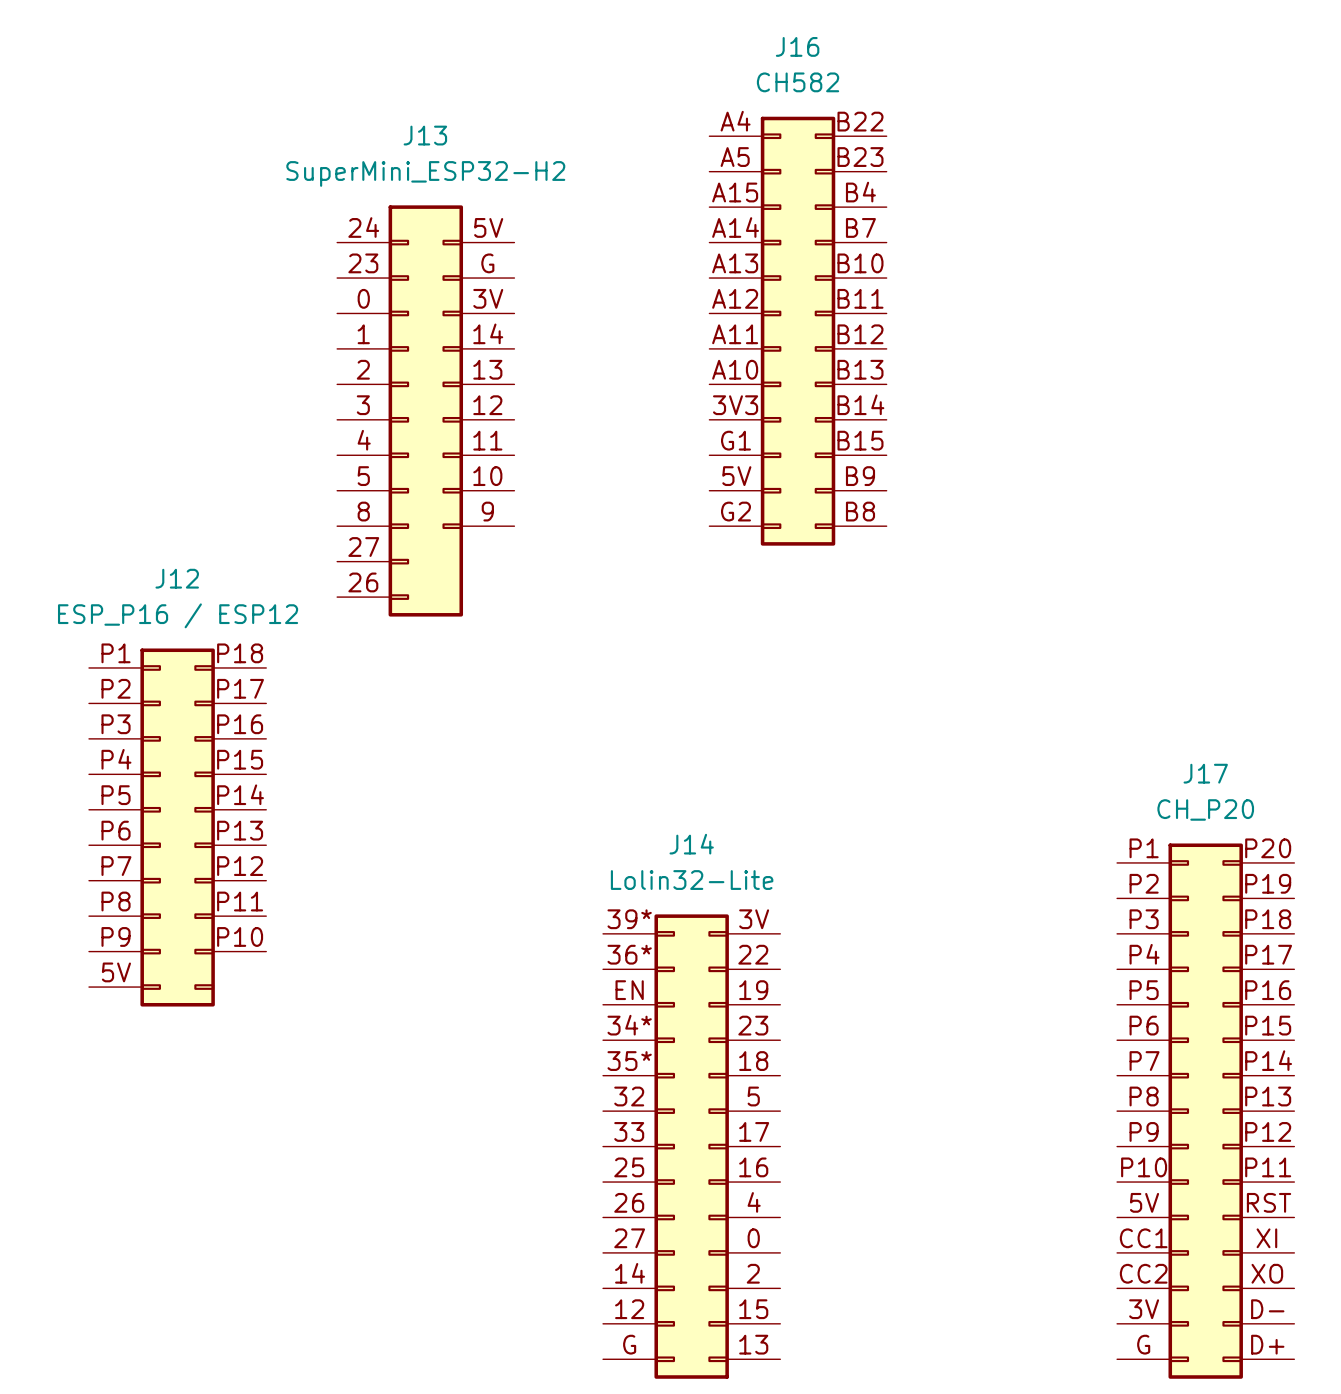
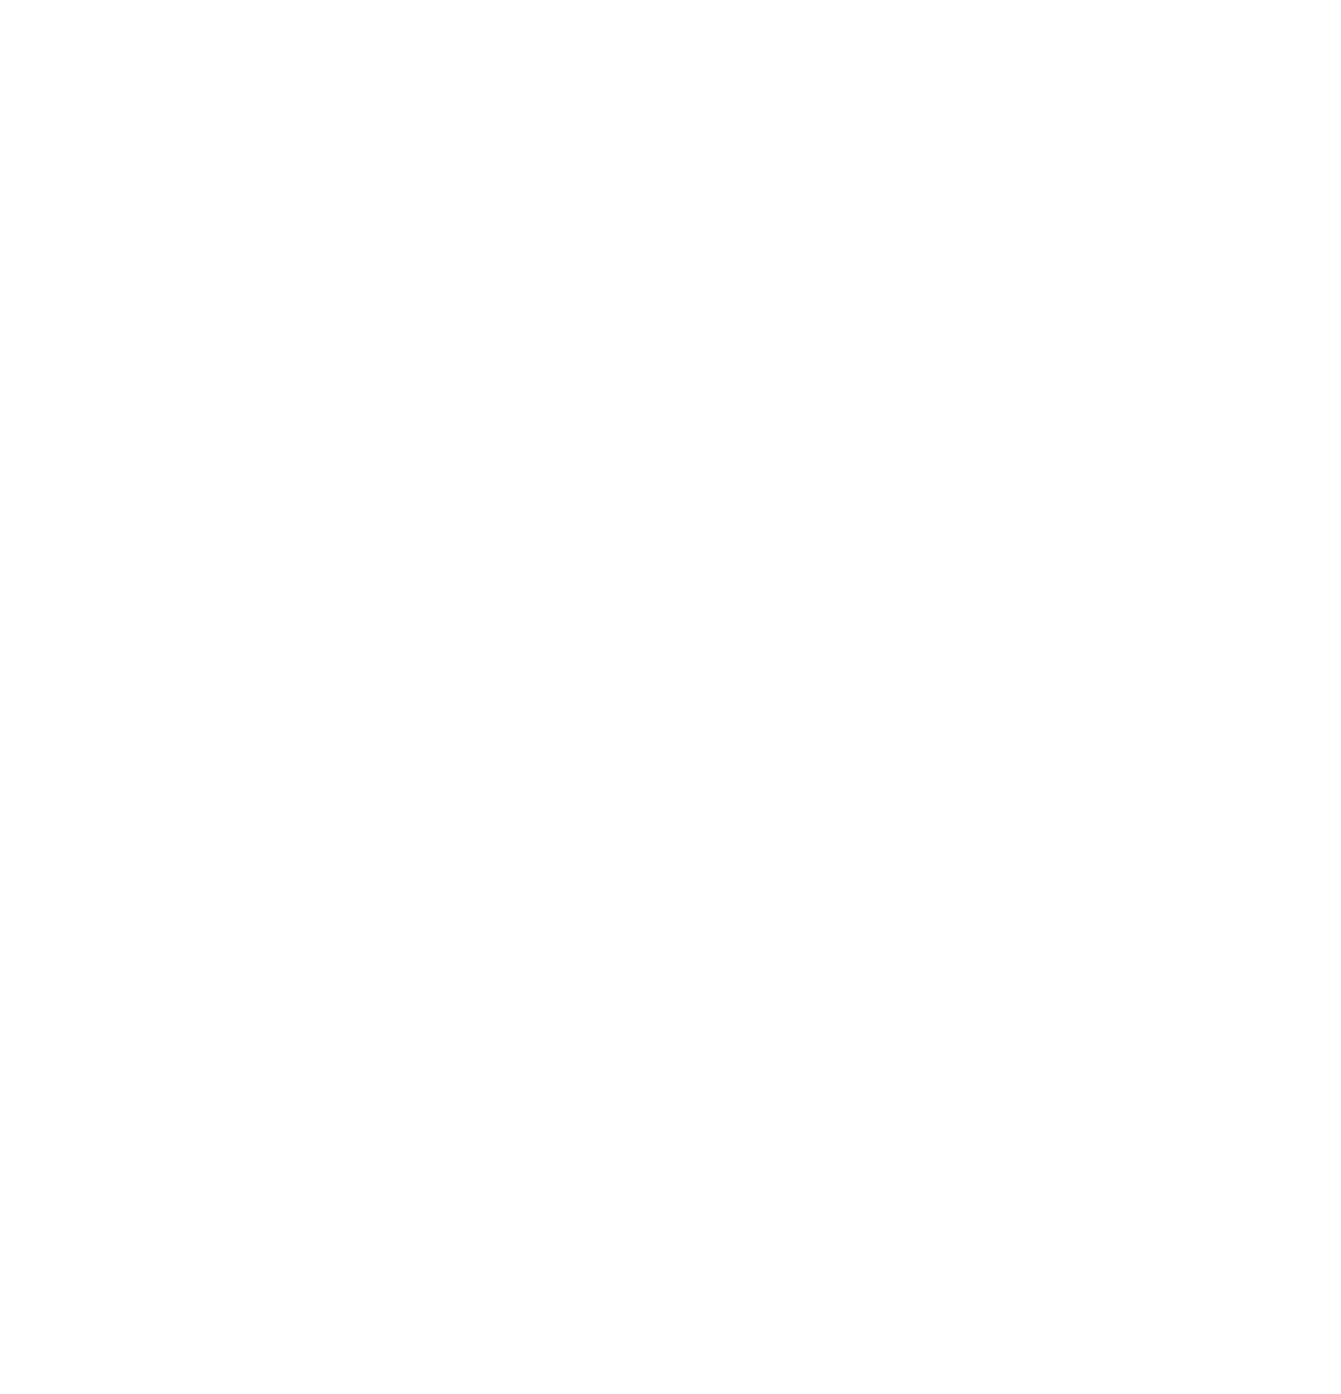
J16: CH582 (798, 331) -> none
J13: SuperMini_ESP32-H2 (425, 410) -> none
J12: ESP_P16 / ESP12 (177, 827) -> none
J17: CH_P20 (1205, 1111) -> none
J14: Lolin32-Lite (691, 1146) -> none

